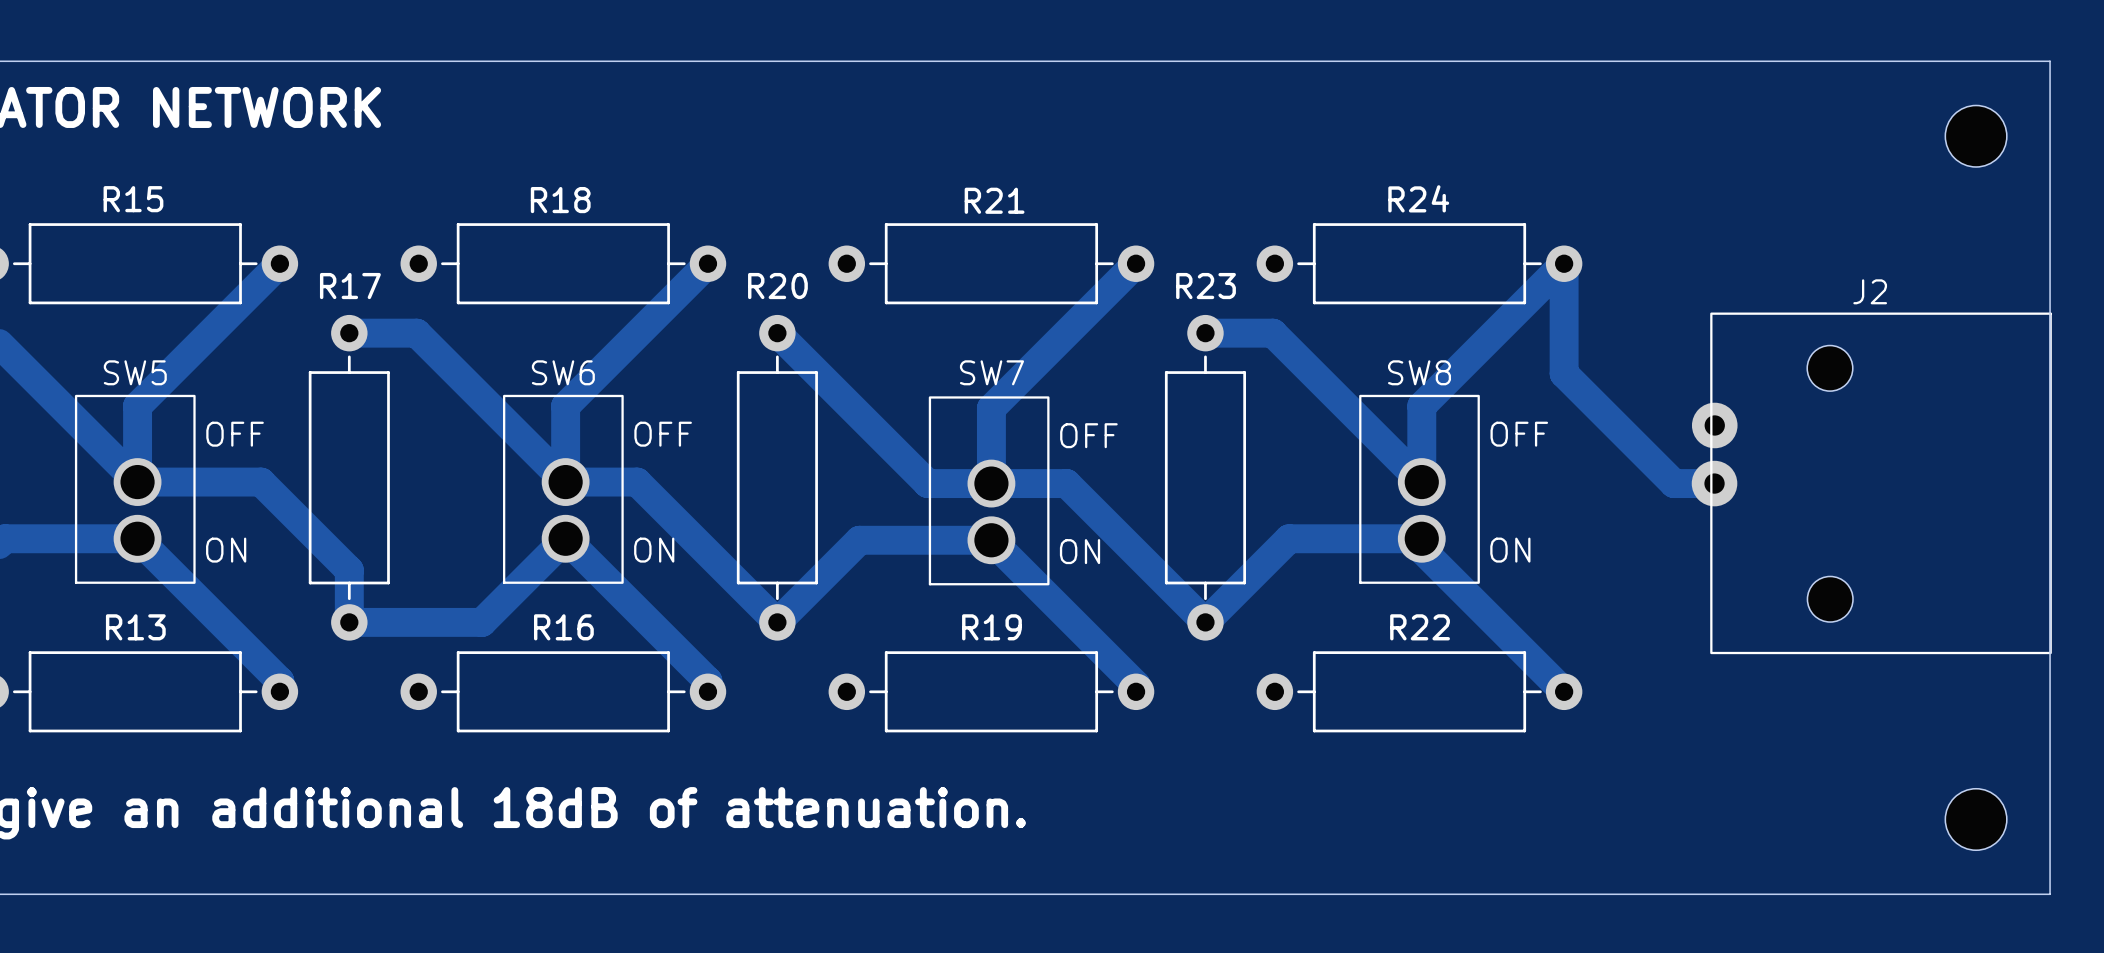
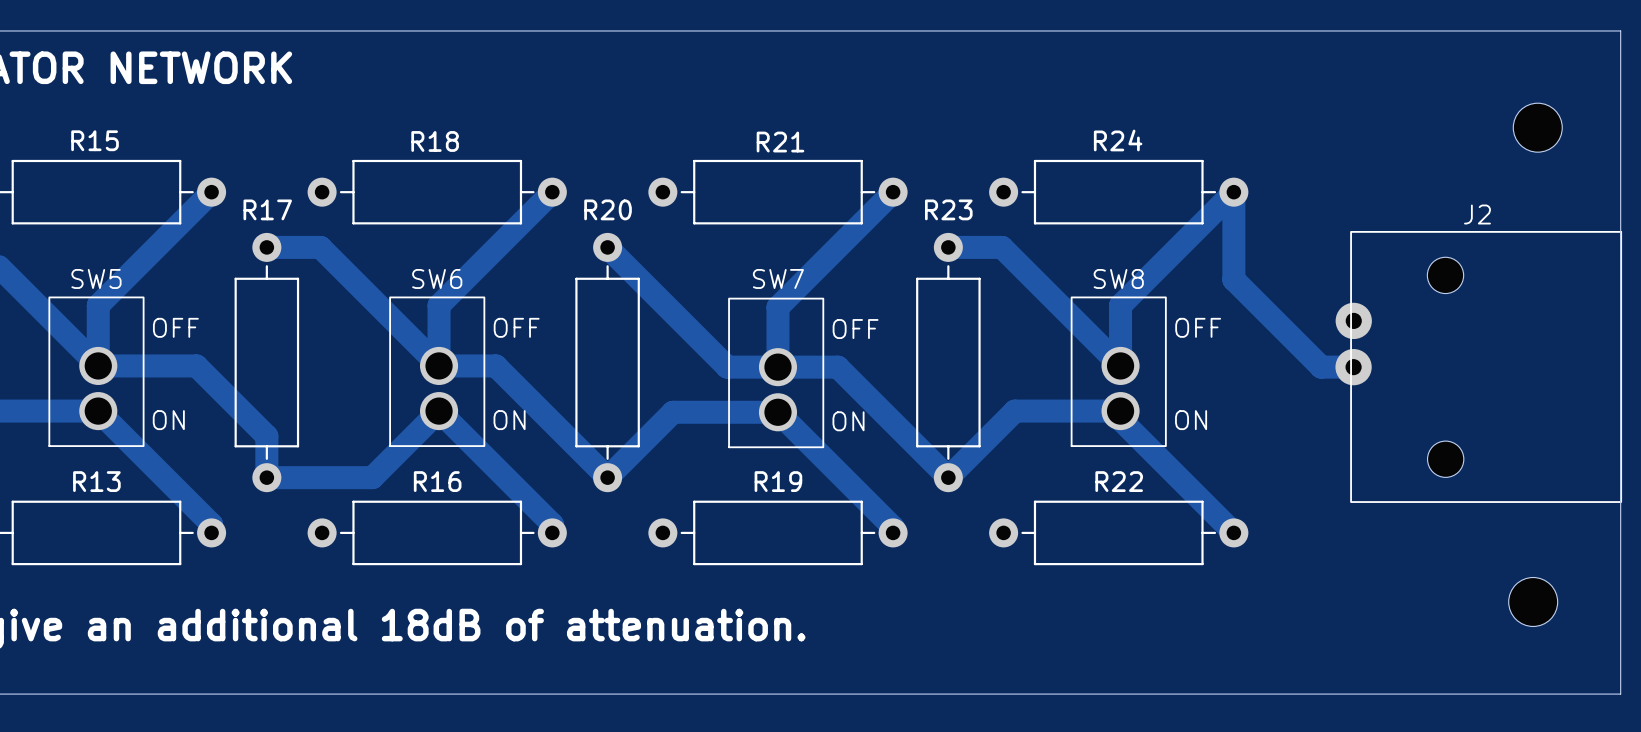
part position: (1976, 136) -> (1537, 127)
part position: (1976, 819) -> (1533, 601)

